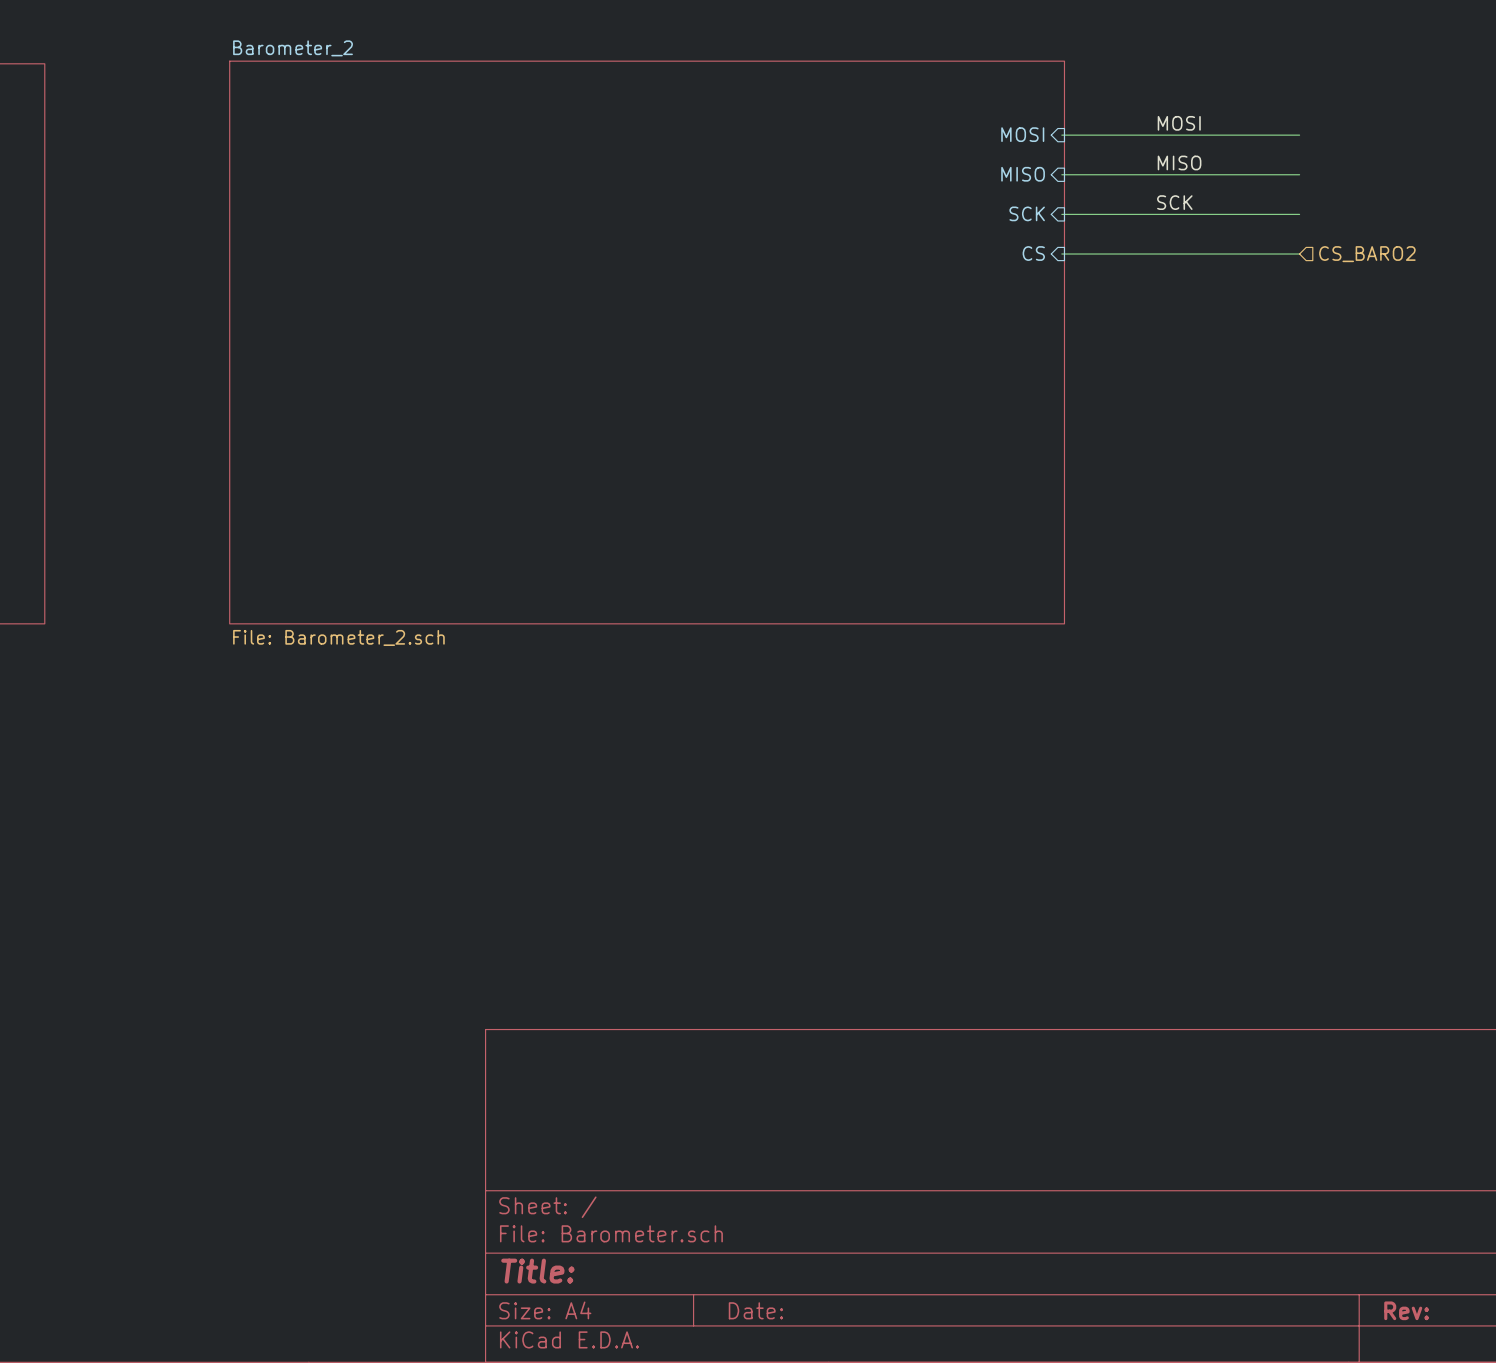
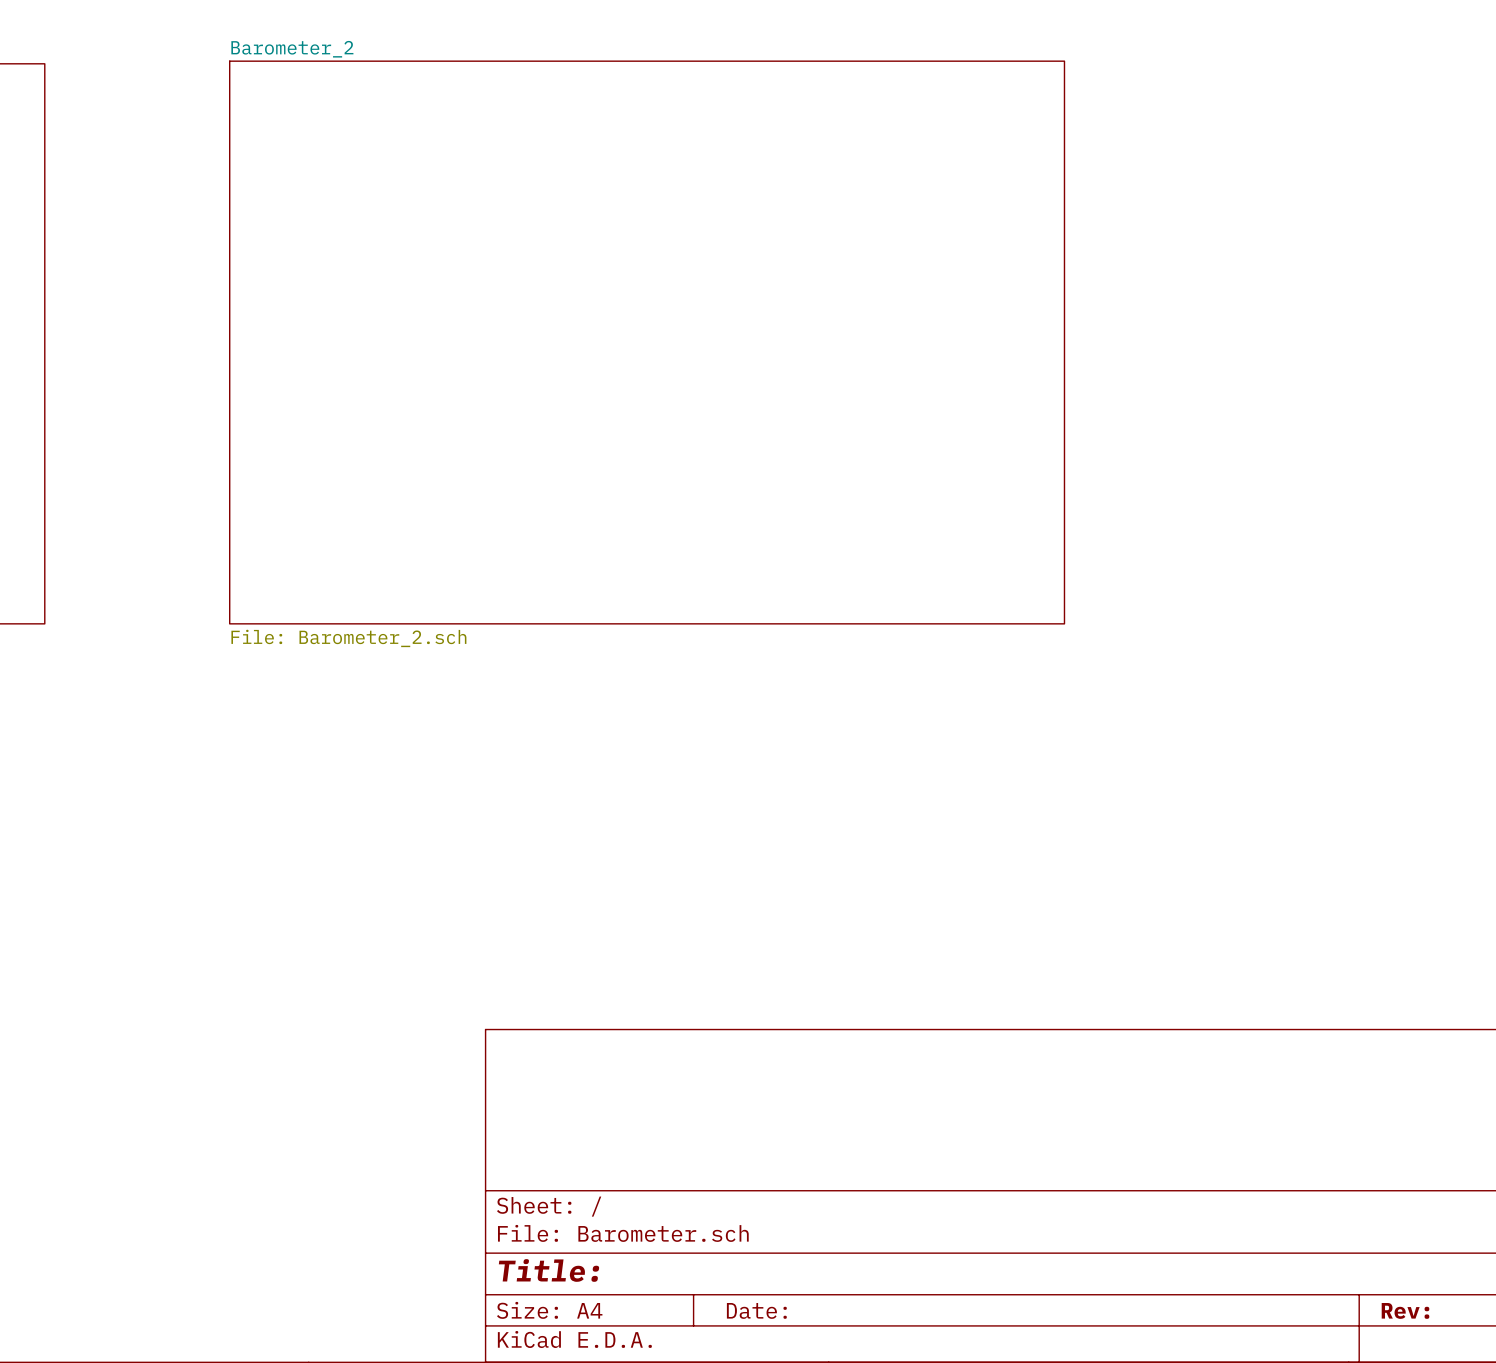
label: MOSI (1179, 123) -> none
sheet pin: MOSI (1022, 134) -> none
wire: (1061, 135) (1299, 135) -> none
label: MISO (1179, 162) -> none
sheet pin: MISO (1023, 174) -> none
wire: (1061, 174) (1299, 174) -> none
label: SCK (1174, 202) -> none
sheet pin: SCK (1027, 213) -> none
wire: (1061, 214) (1299, 214) -> none
sheet pin: CS (1033, 253) -> none
wire: (1061, 254) (1299, 254) -> none
hierarchical label: CS_BARO2 (1367, 254) -> none

